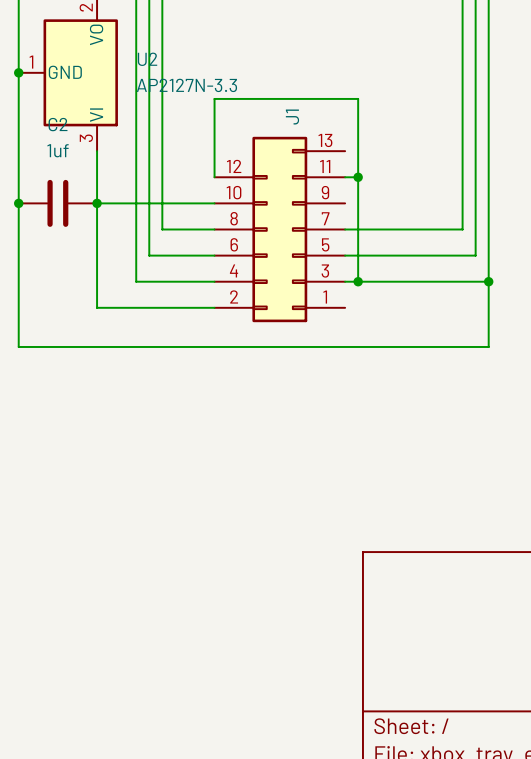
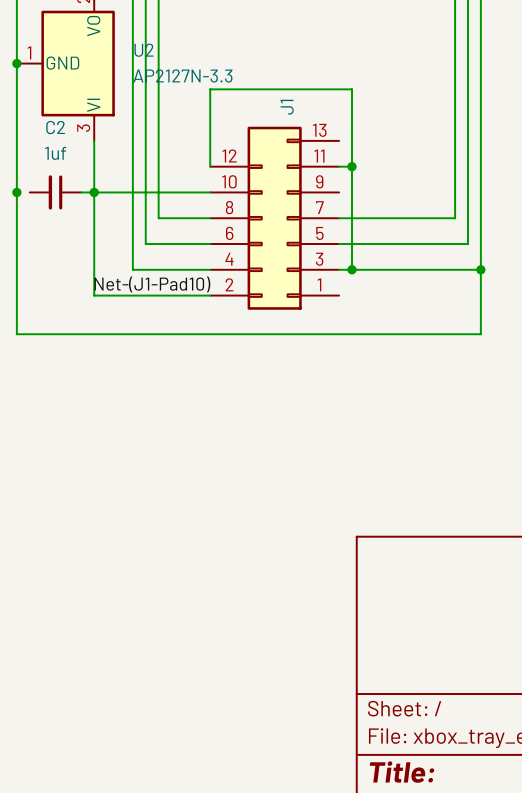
C2 symbol: [18, 179, 98, 227] -> [29, 175, 82, 210]
label: none -> Net-(J1-Pad10) (152, 284)

